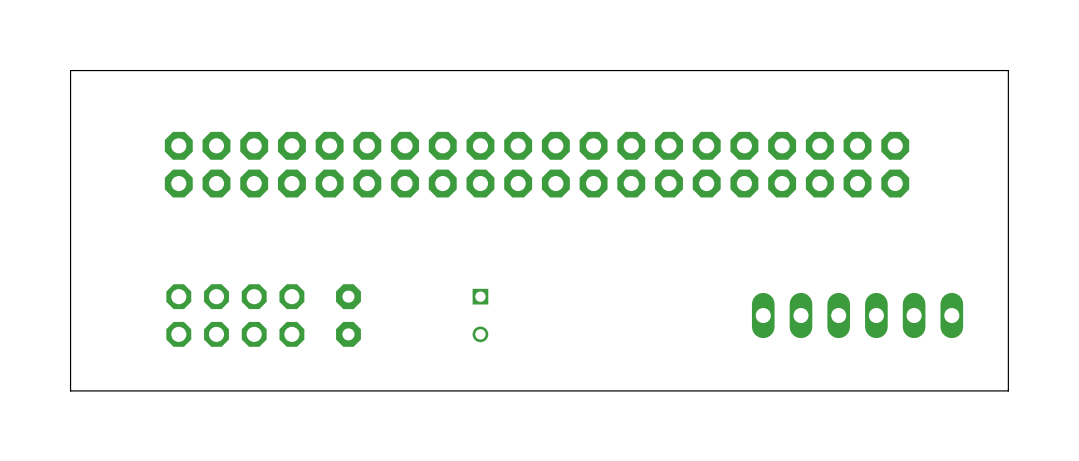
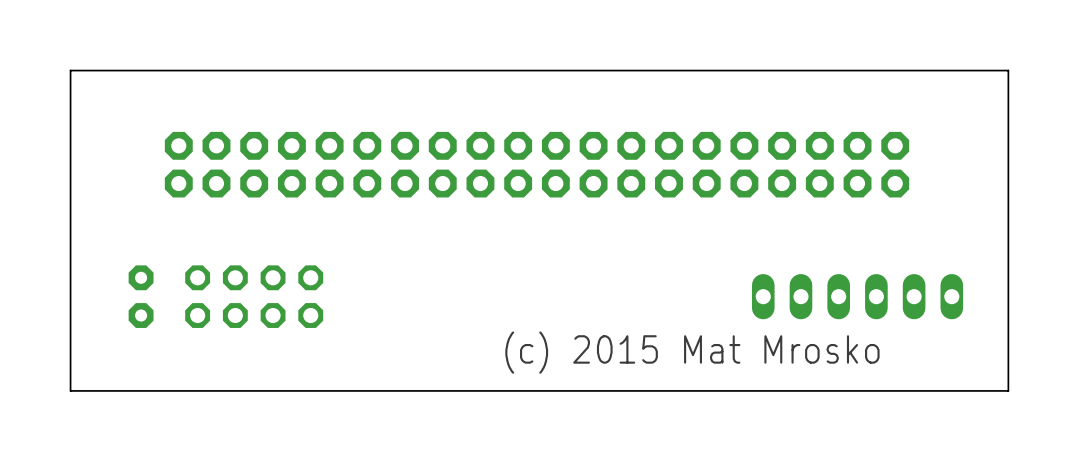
part position: (235, 315) -> (254, 296)
part position: (348, 315) -> (141, 296)
part: (480, 315) -> none
part position: (857, 315) -> (857, 296)
text: none -> (c) 2015 Mat Mrosko (692, 352)

